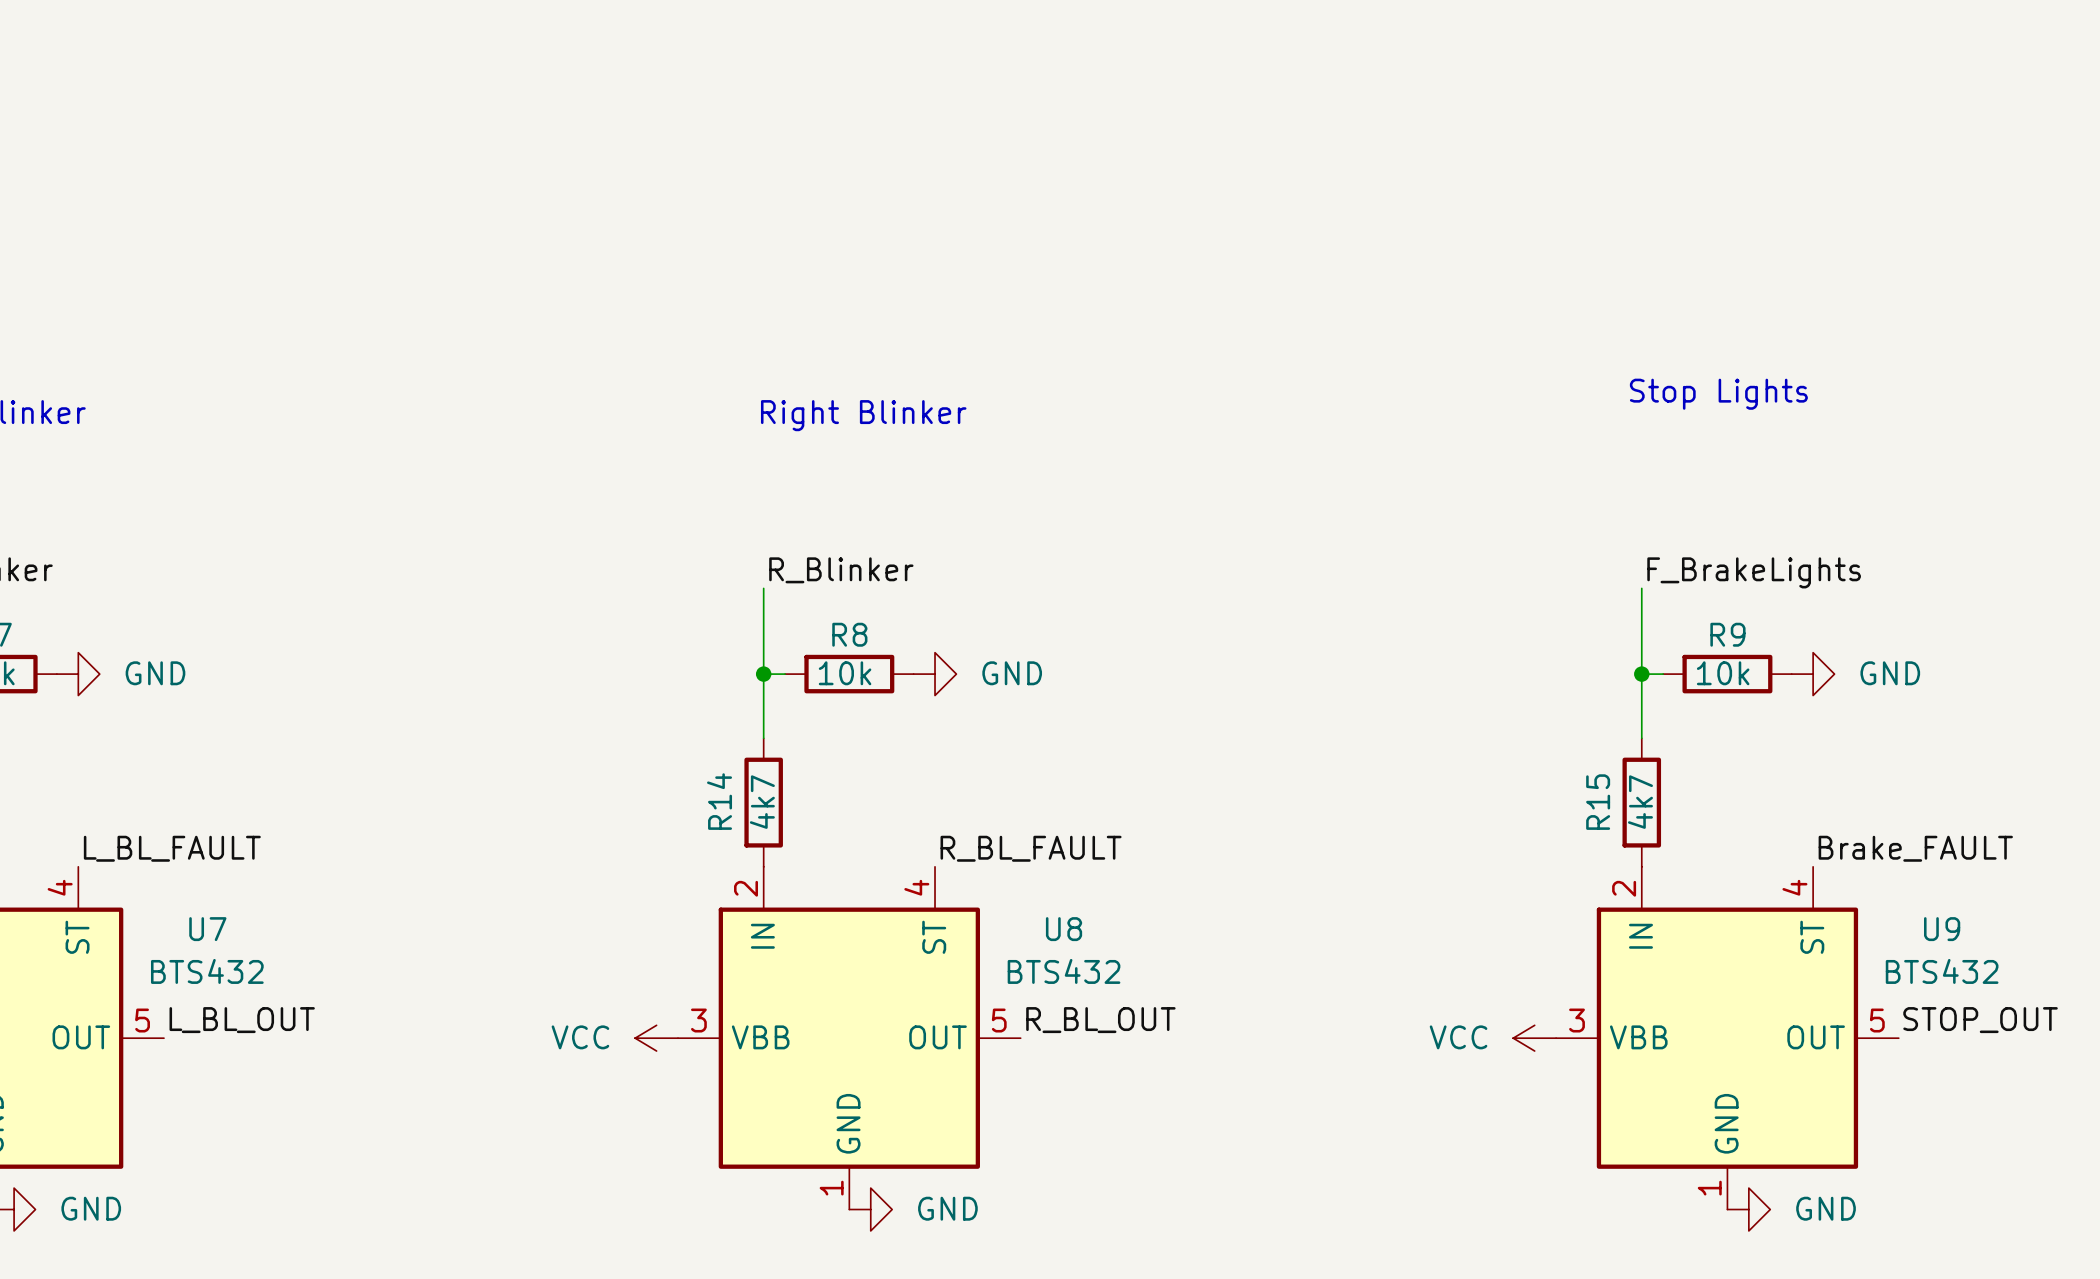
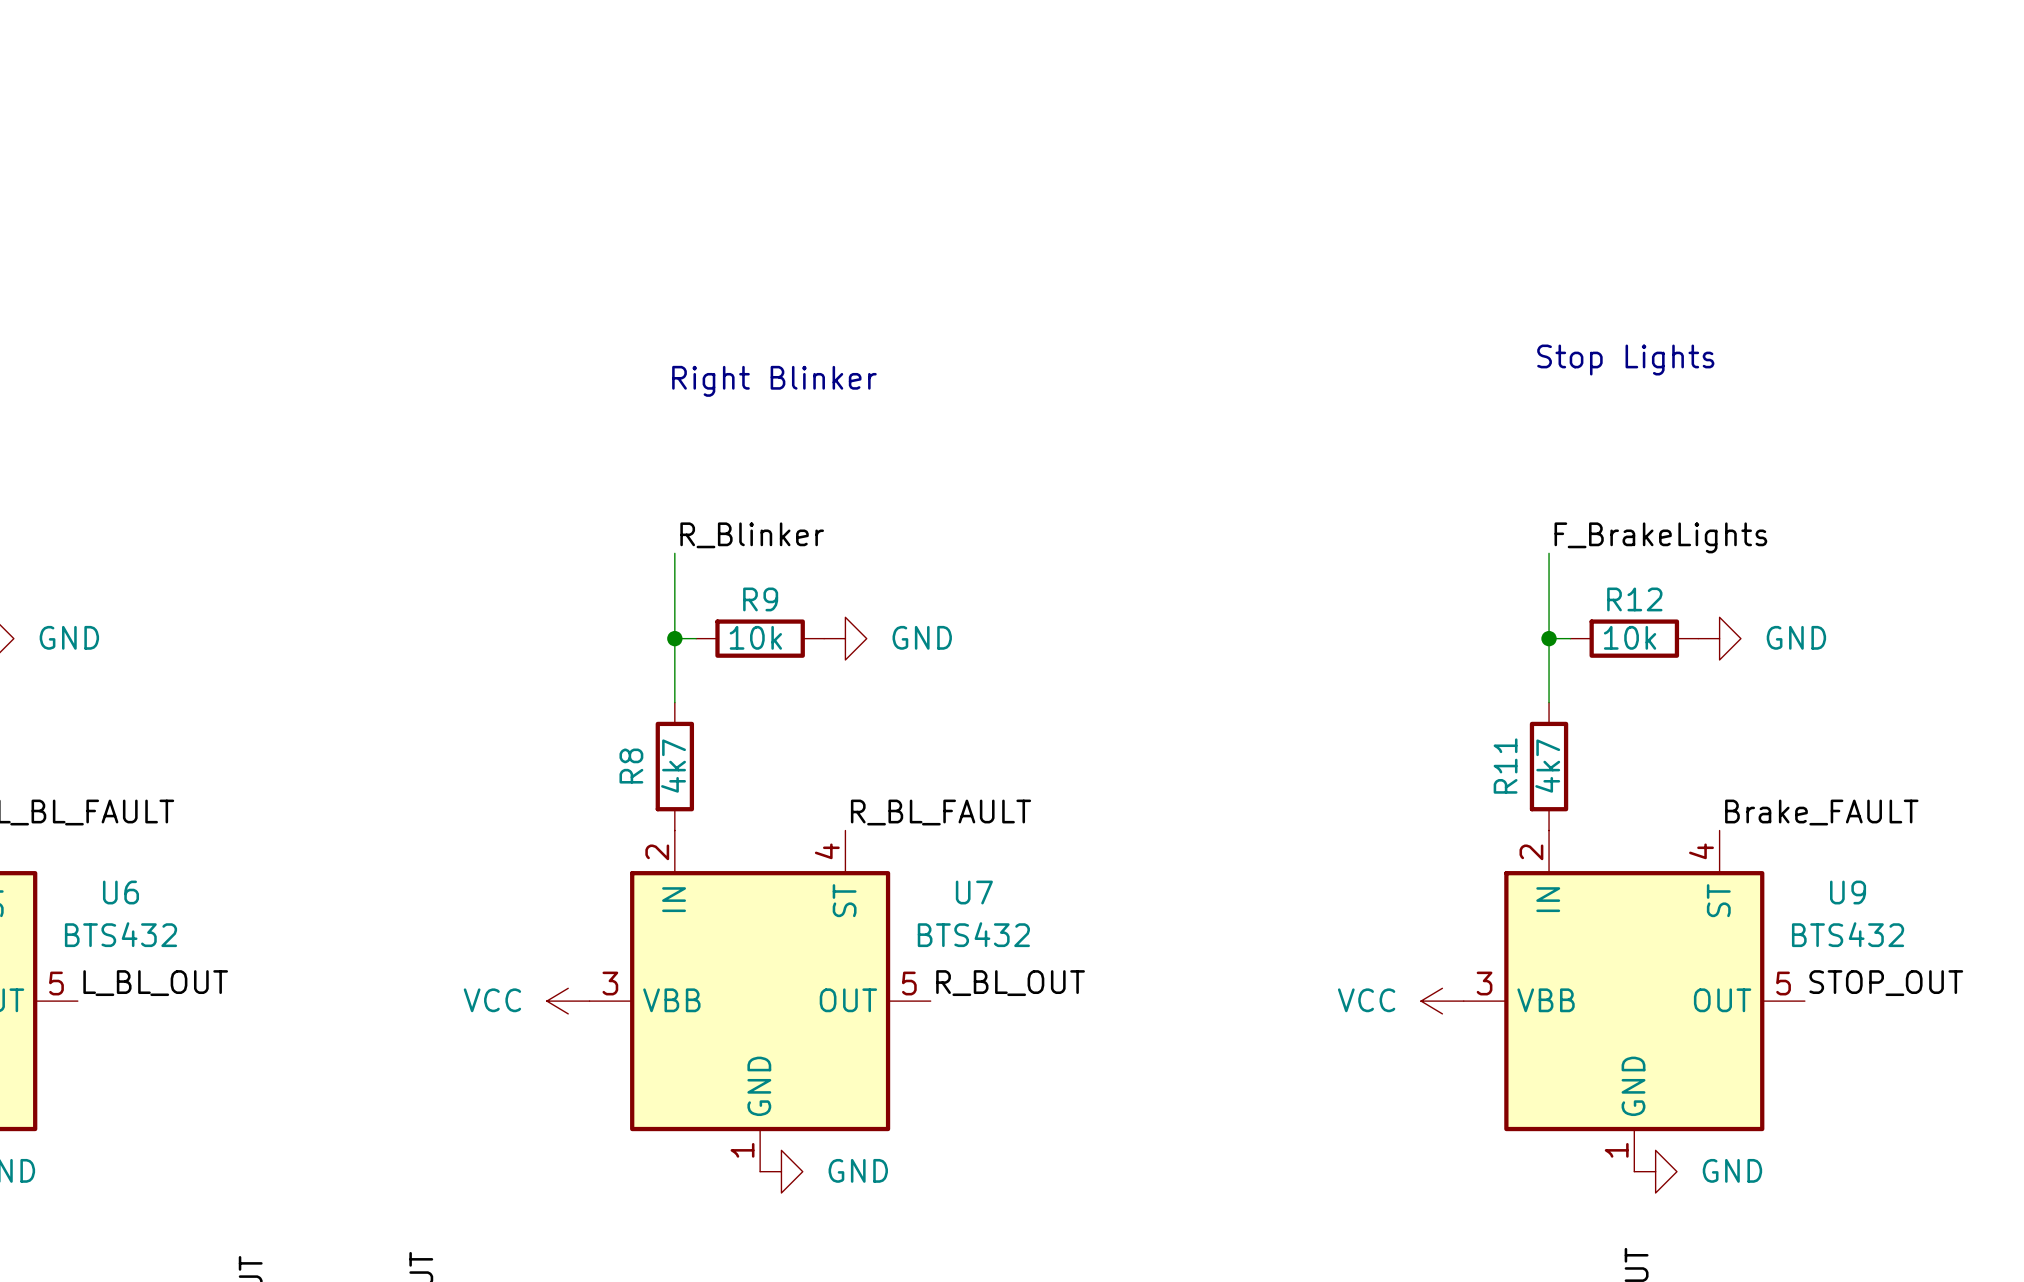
R8 name: R8 (849, 634) -> R9 (760, 599)
R9 name: R9 (1727, 634) -> R12 (1634, 599)
R14 name: R14 (719, 801) -> R8 (631, 766)
R15 name: R15 (1598, 802) -> R11 (1505, 766)
U7 name: U7 (207, 929) -> U6 (120, 892)
U8 name: U8 (1064, 929) -> U7 (974, 892)

